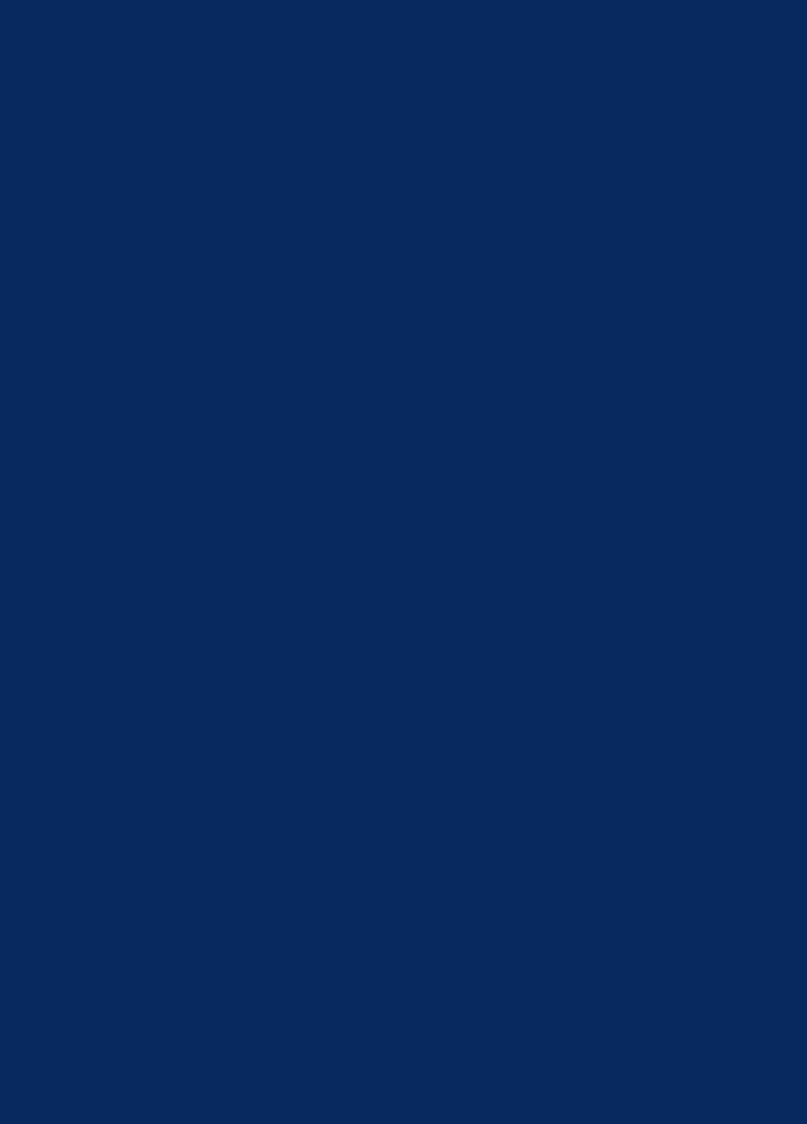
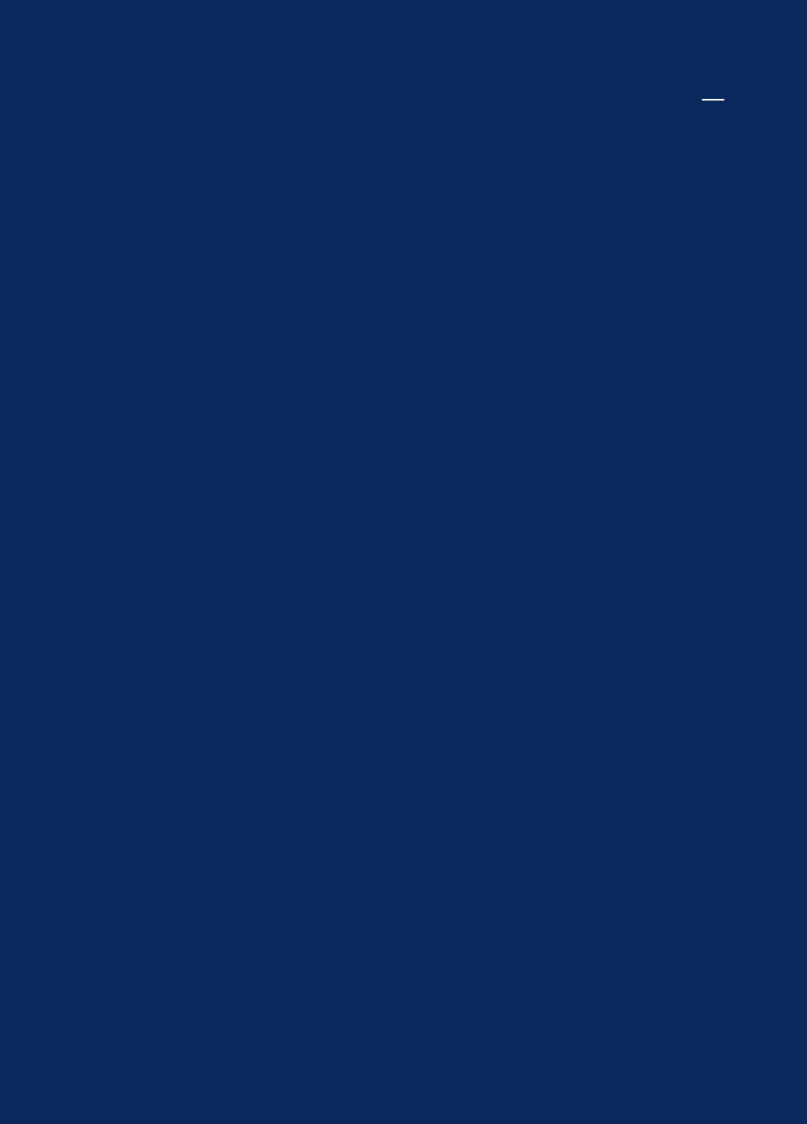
drawing: none -> [701, 98, 725, 101]

